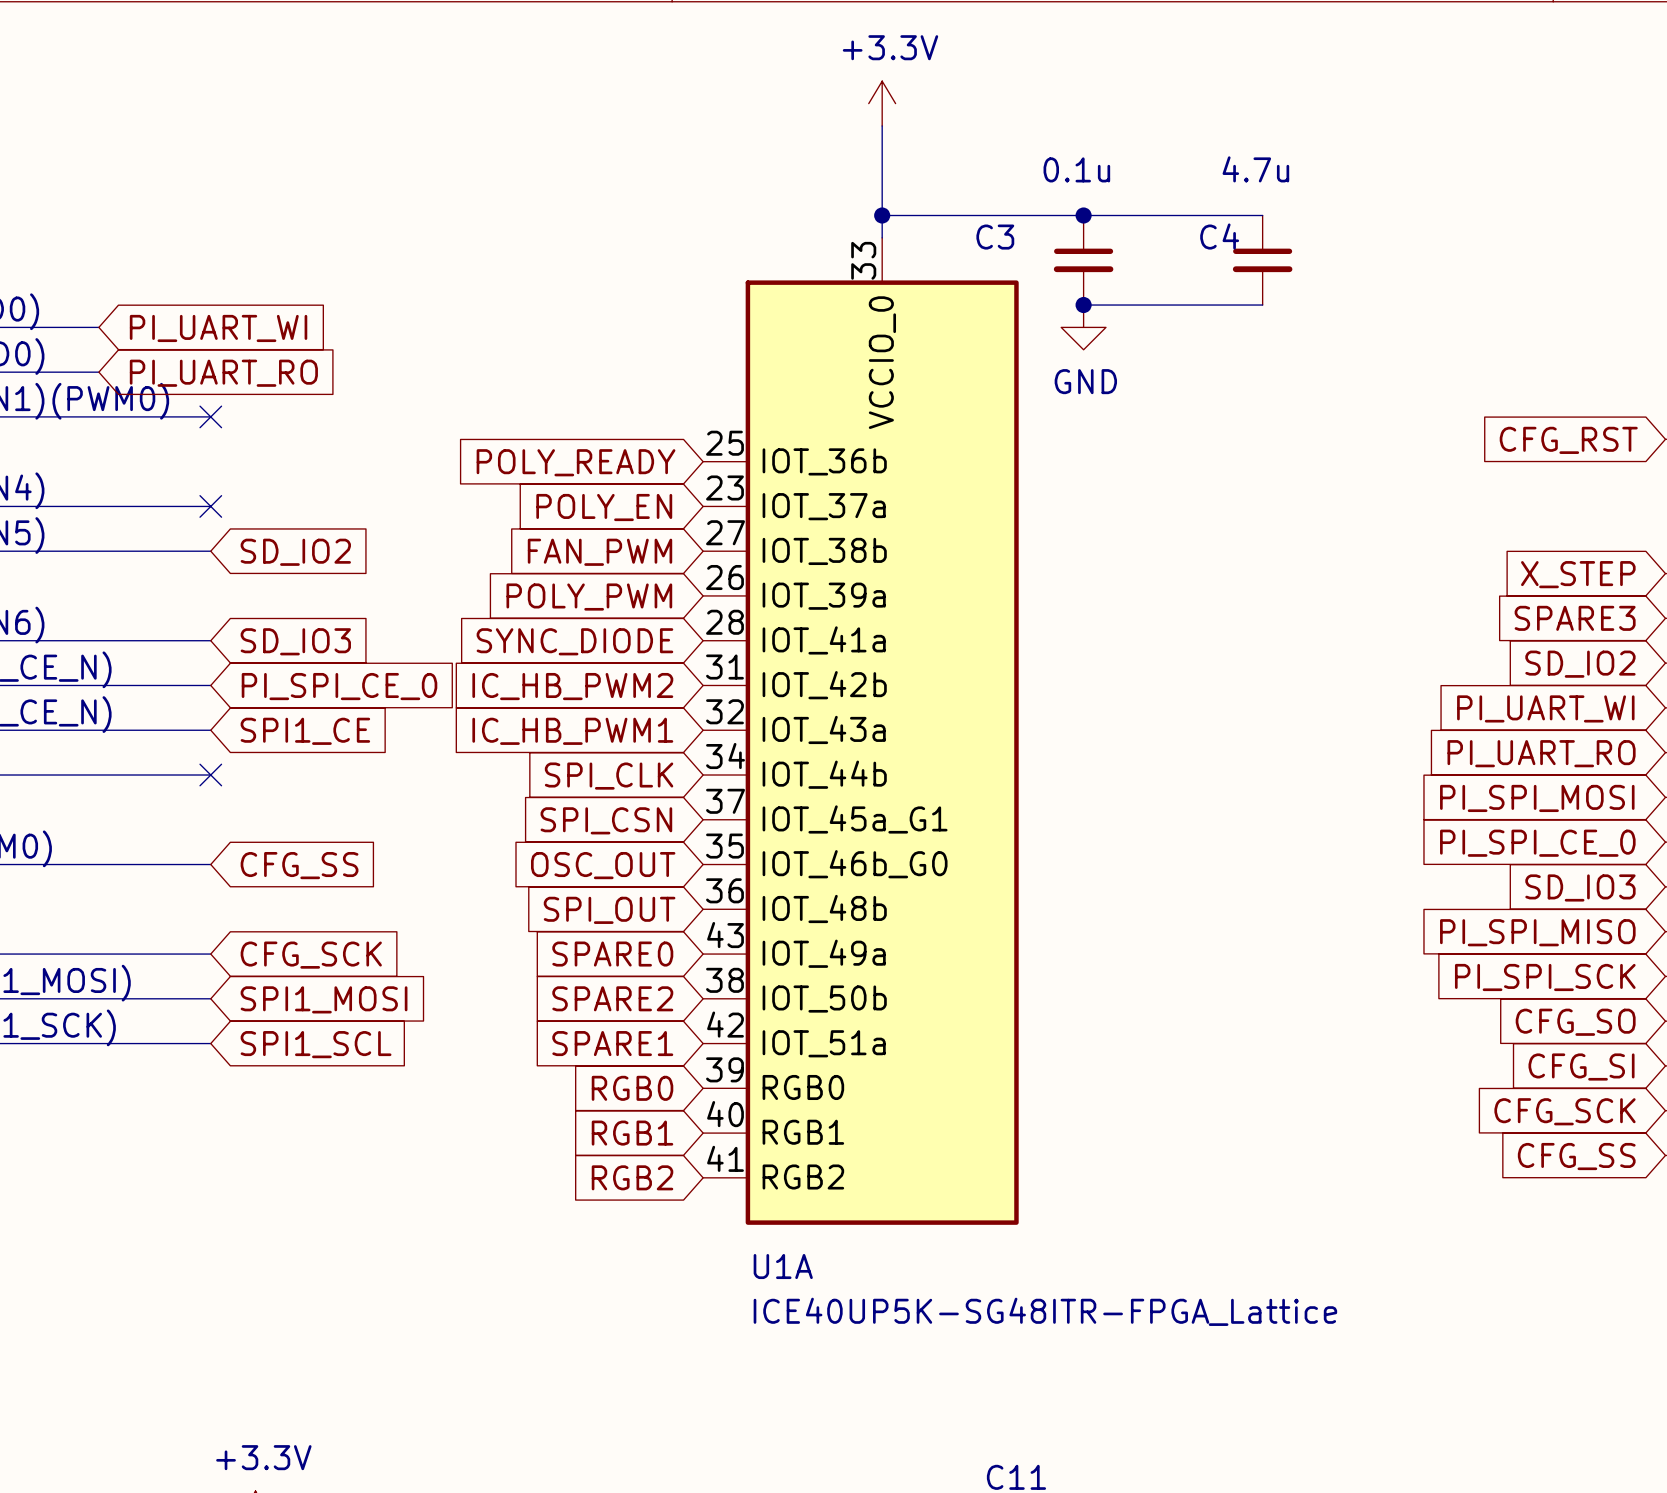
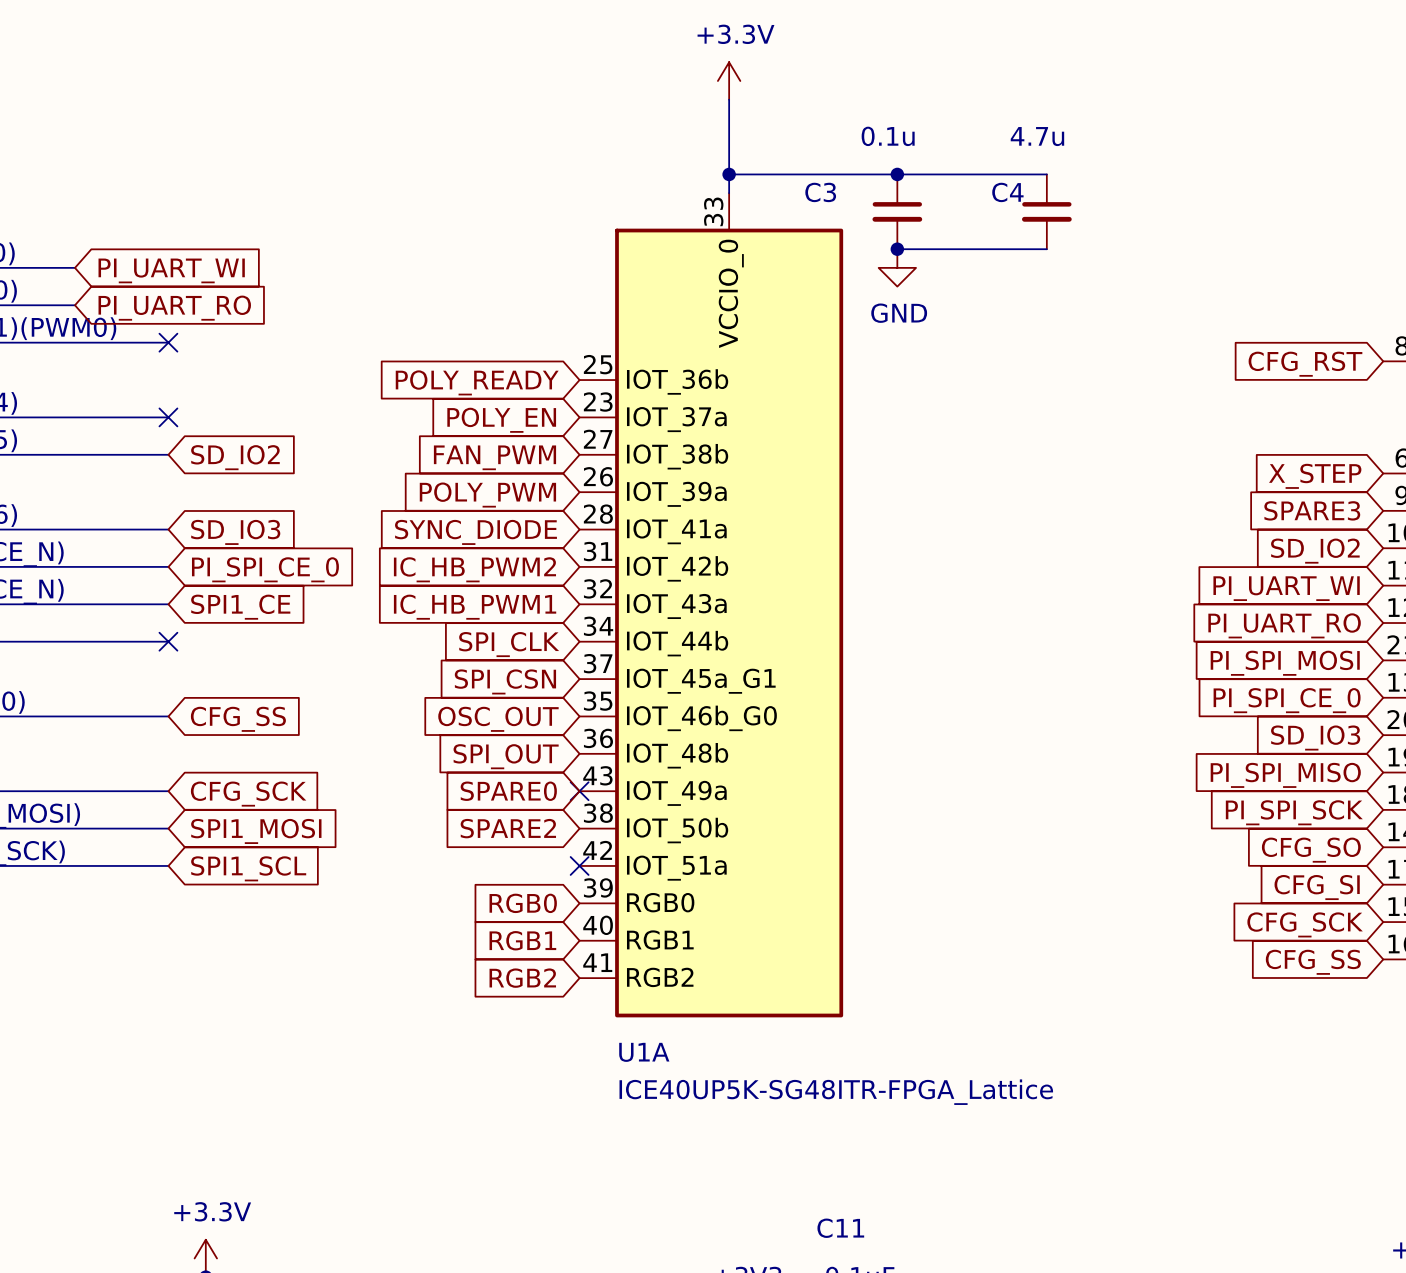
no-connect mark: none -> (579, 791)
global label: SPARE1 (612, 1043) -> none
no-connect mark: none -> (579, 865)

